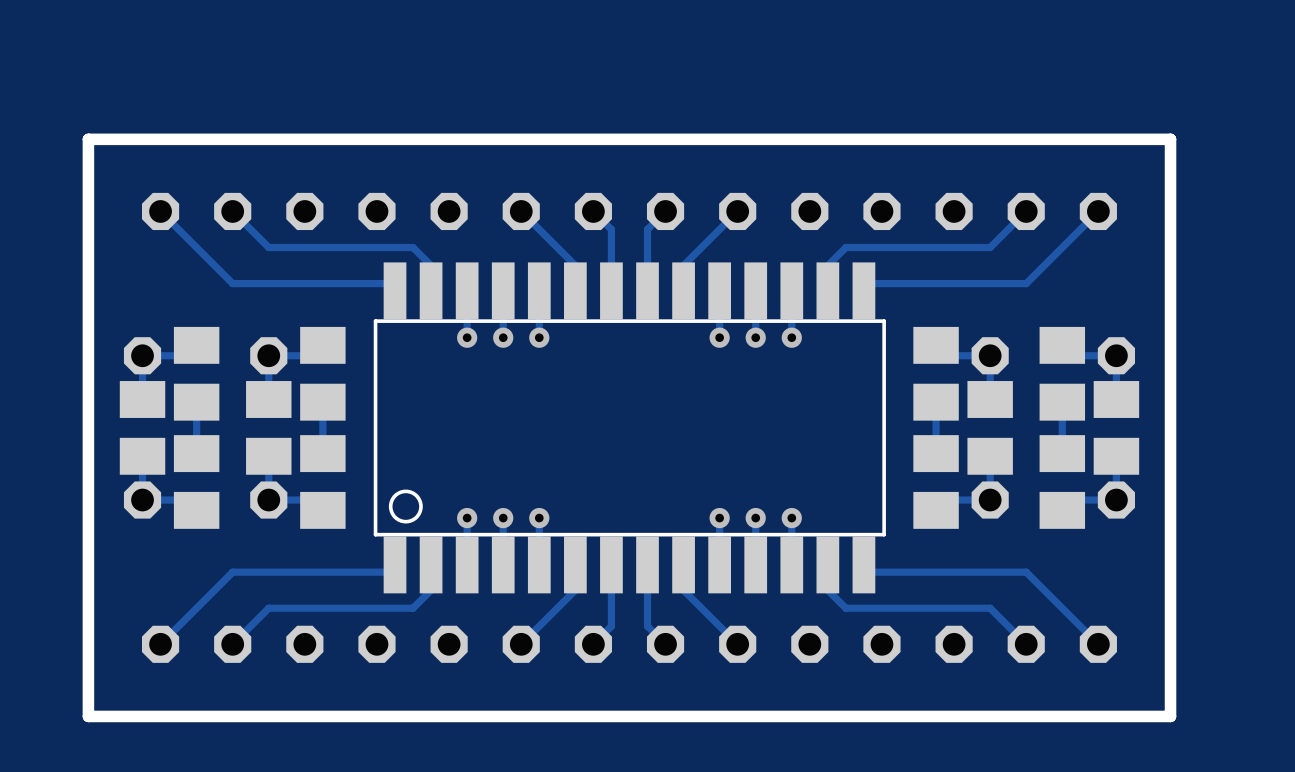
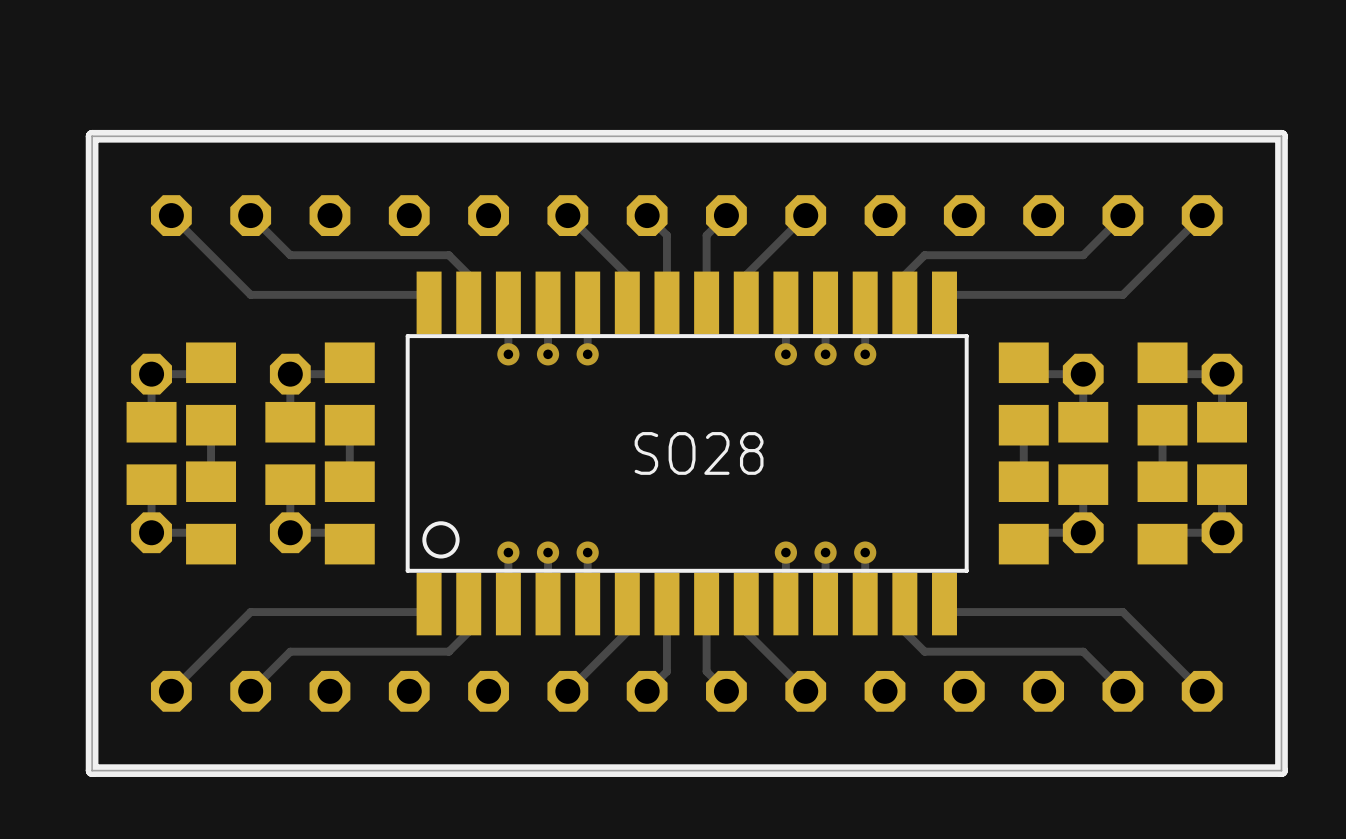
board edge: none -> (92, 136) (92, 770) (1281, 770) (1281, 136) (92, 136)
text: none -> SO28 (699, 453)

